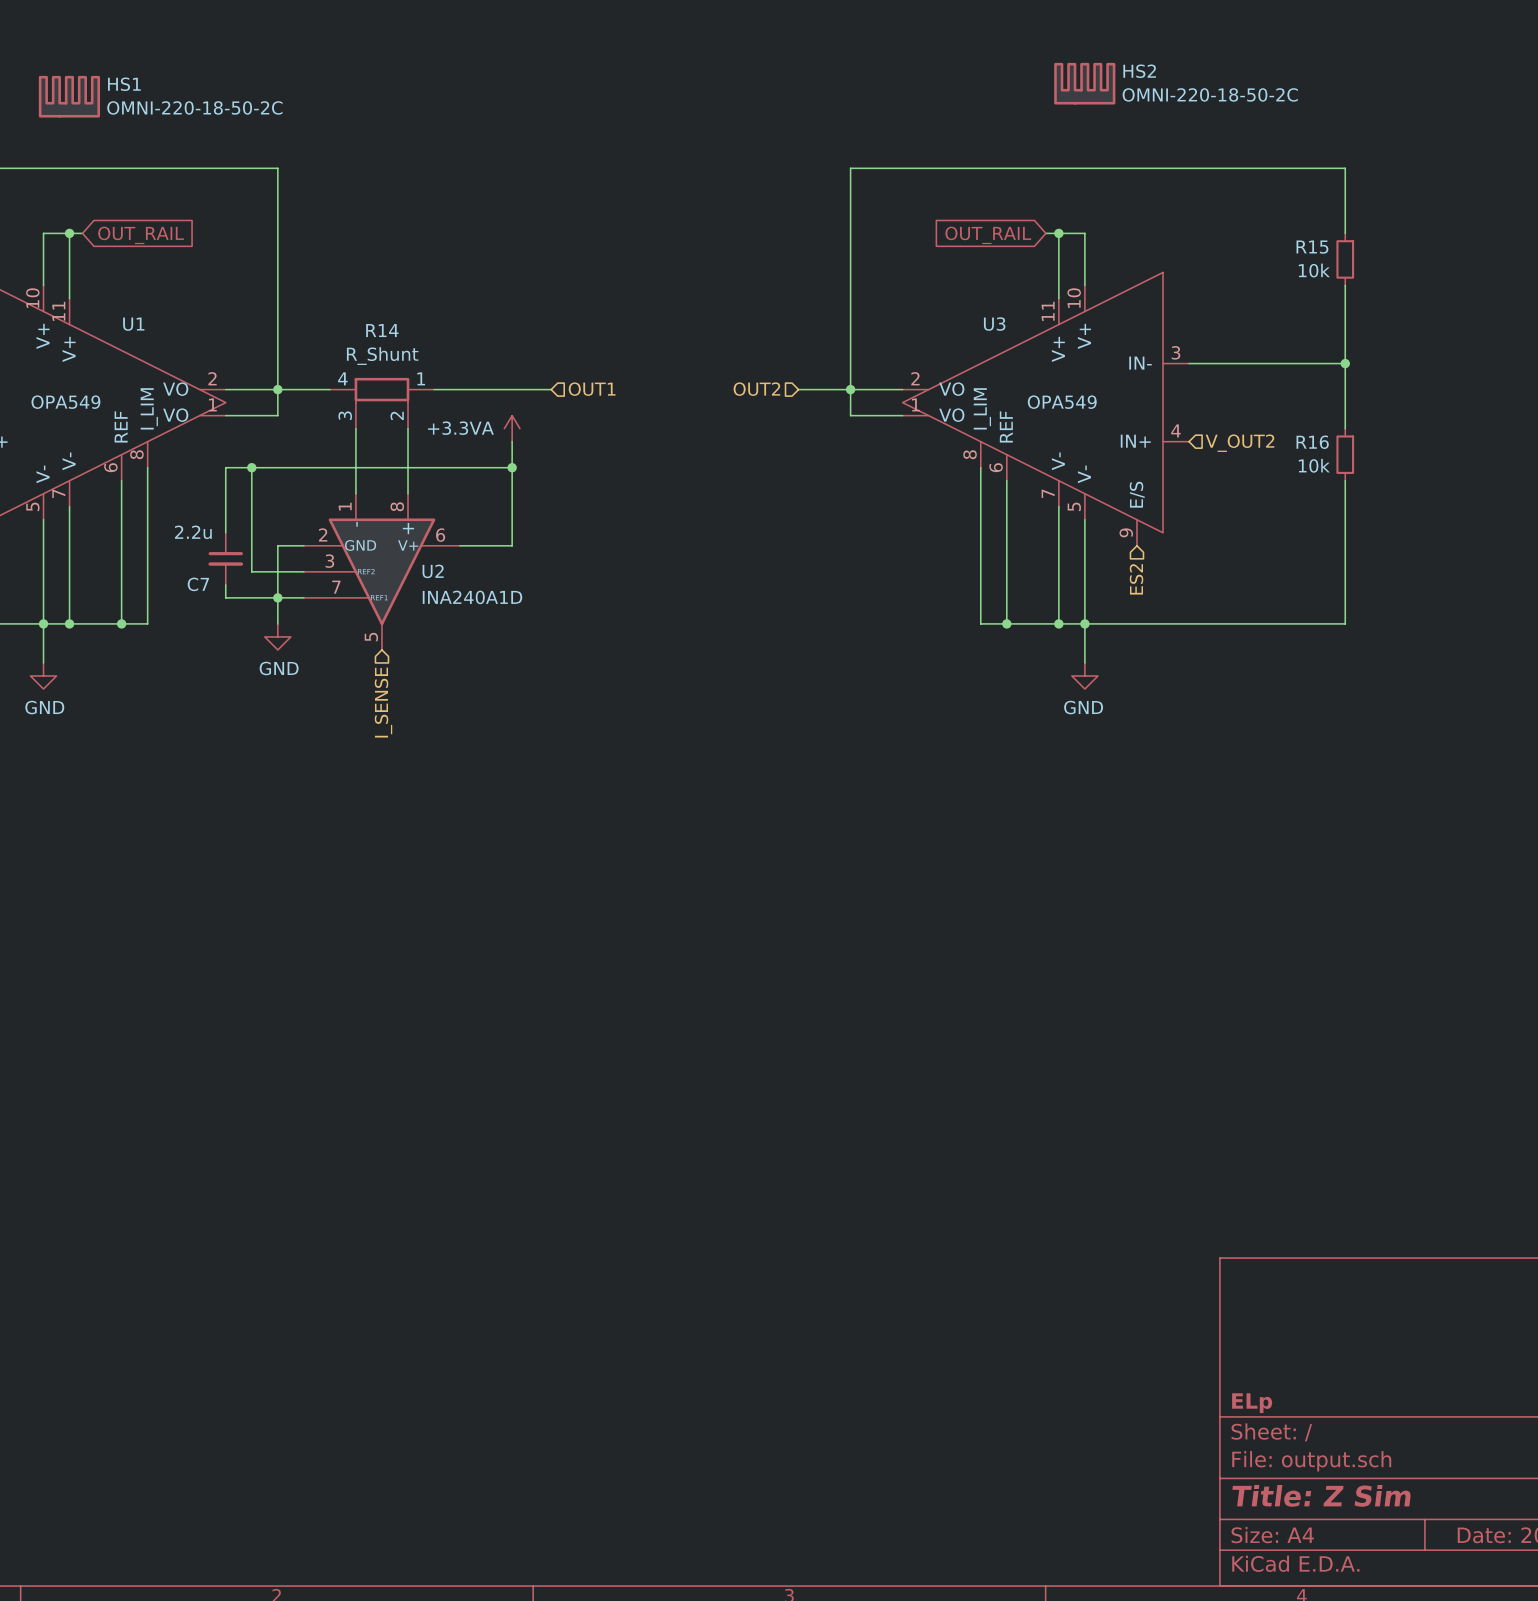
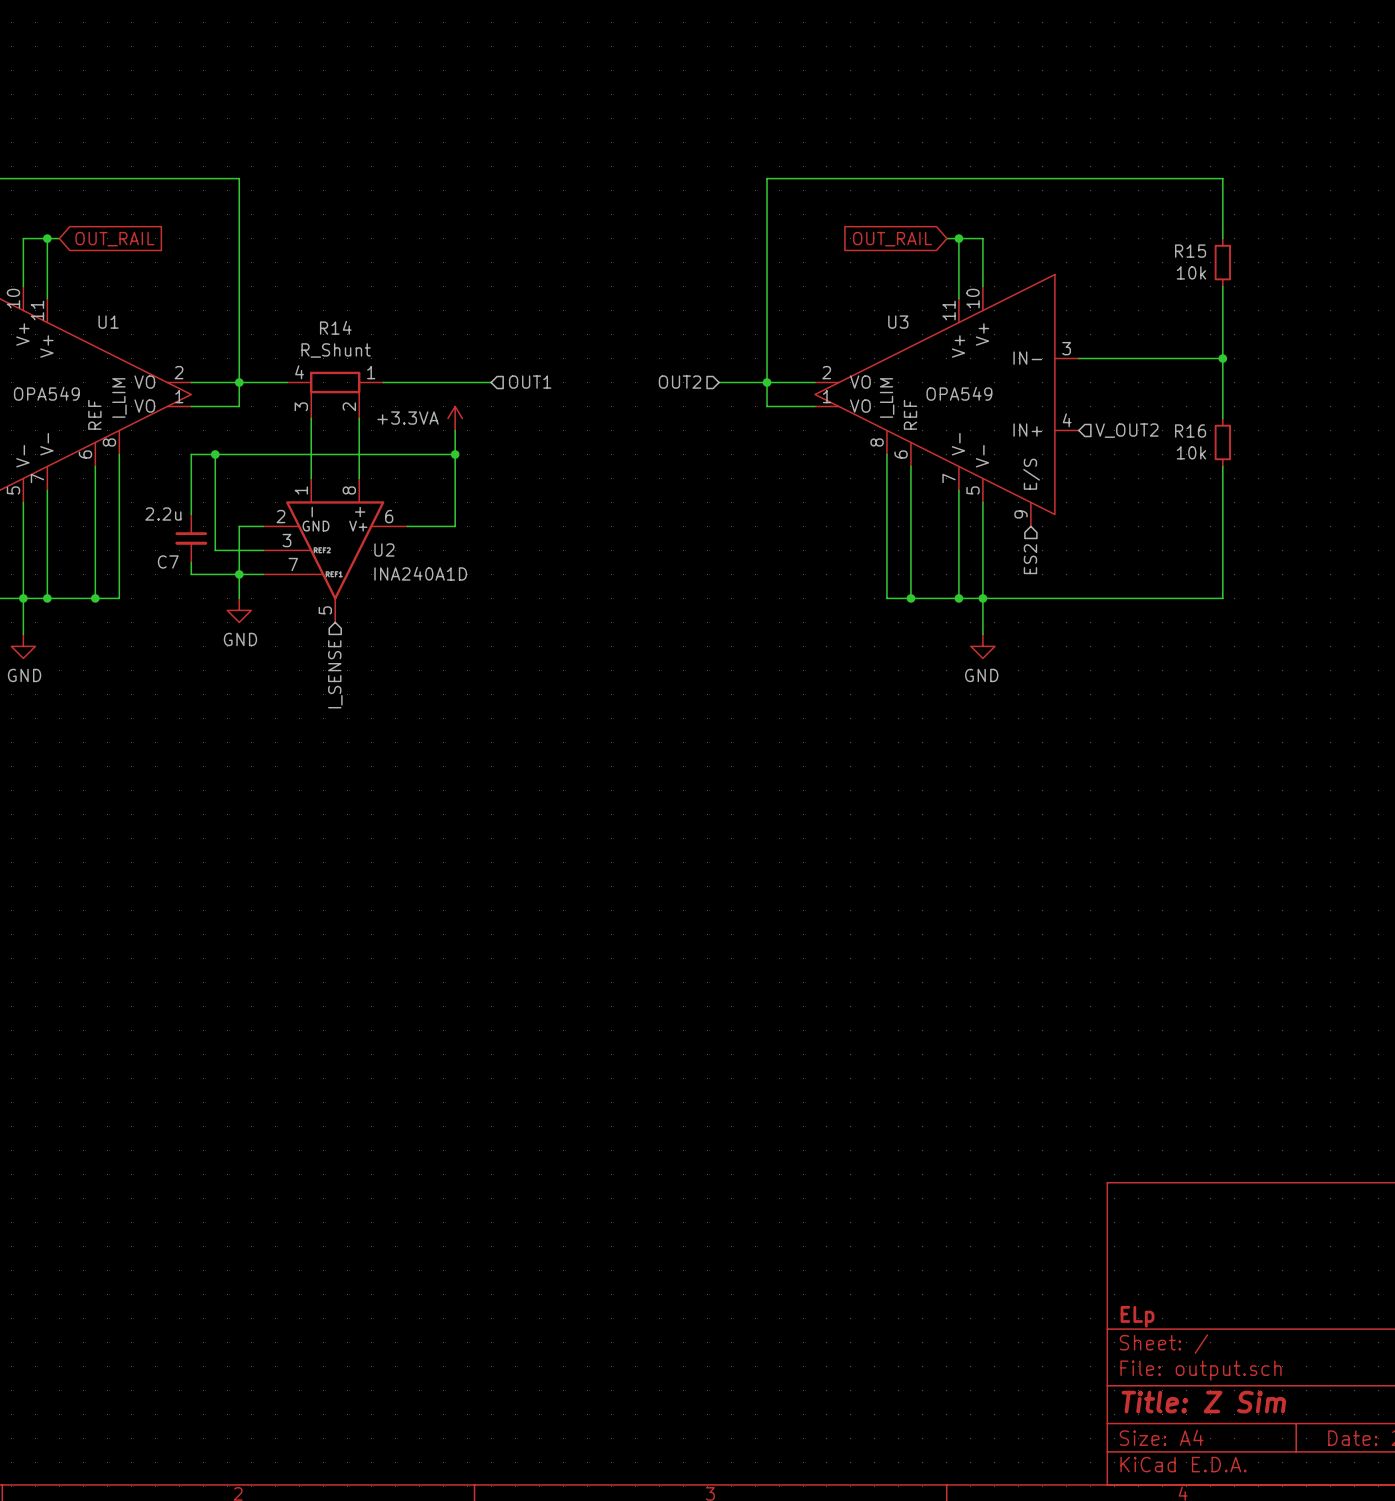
HS2: OMNI-220-18-50-2C (1084, 83) -> none
HS1: OMNI-220-18-50-2C (69, 96) -> none

